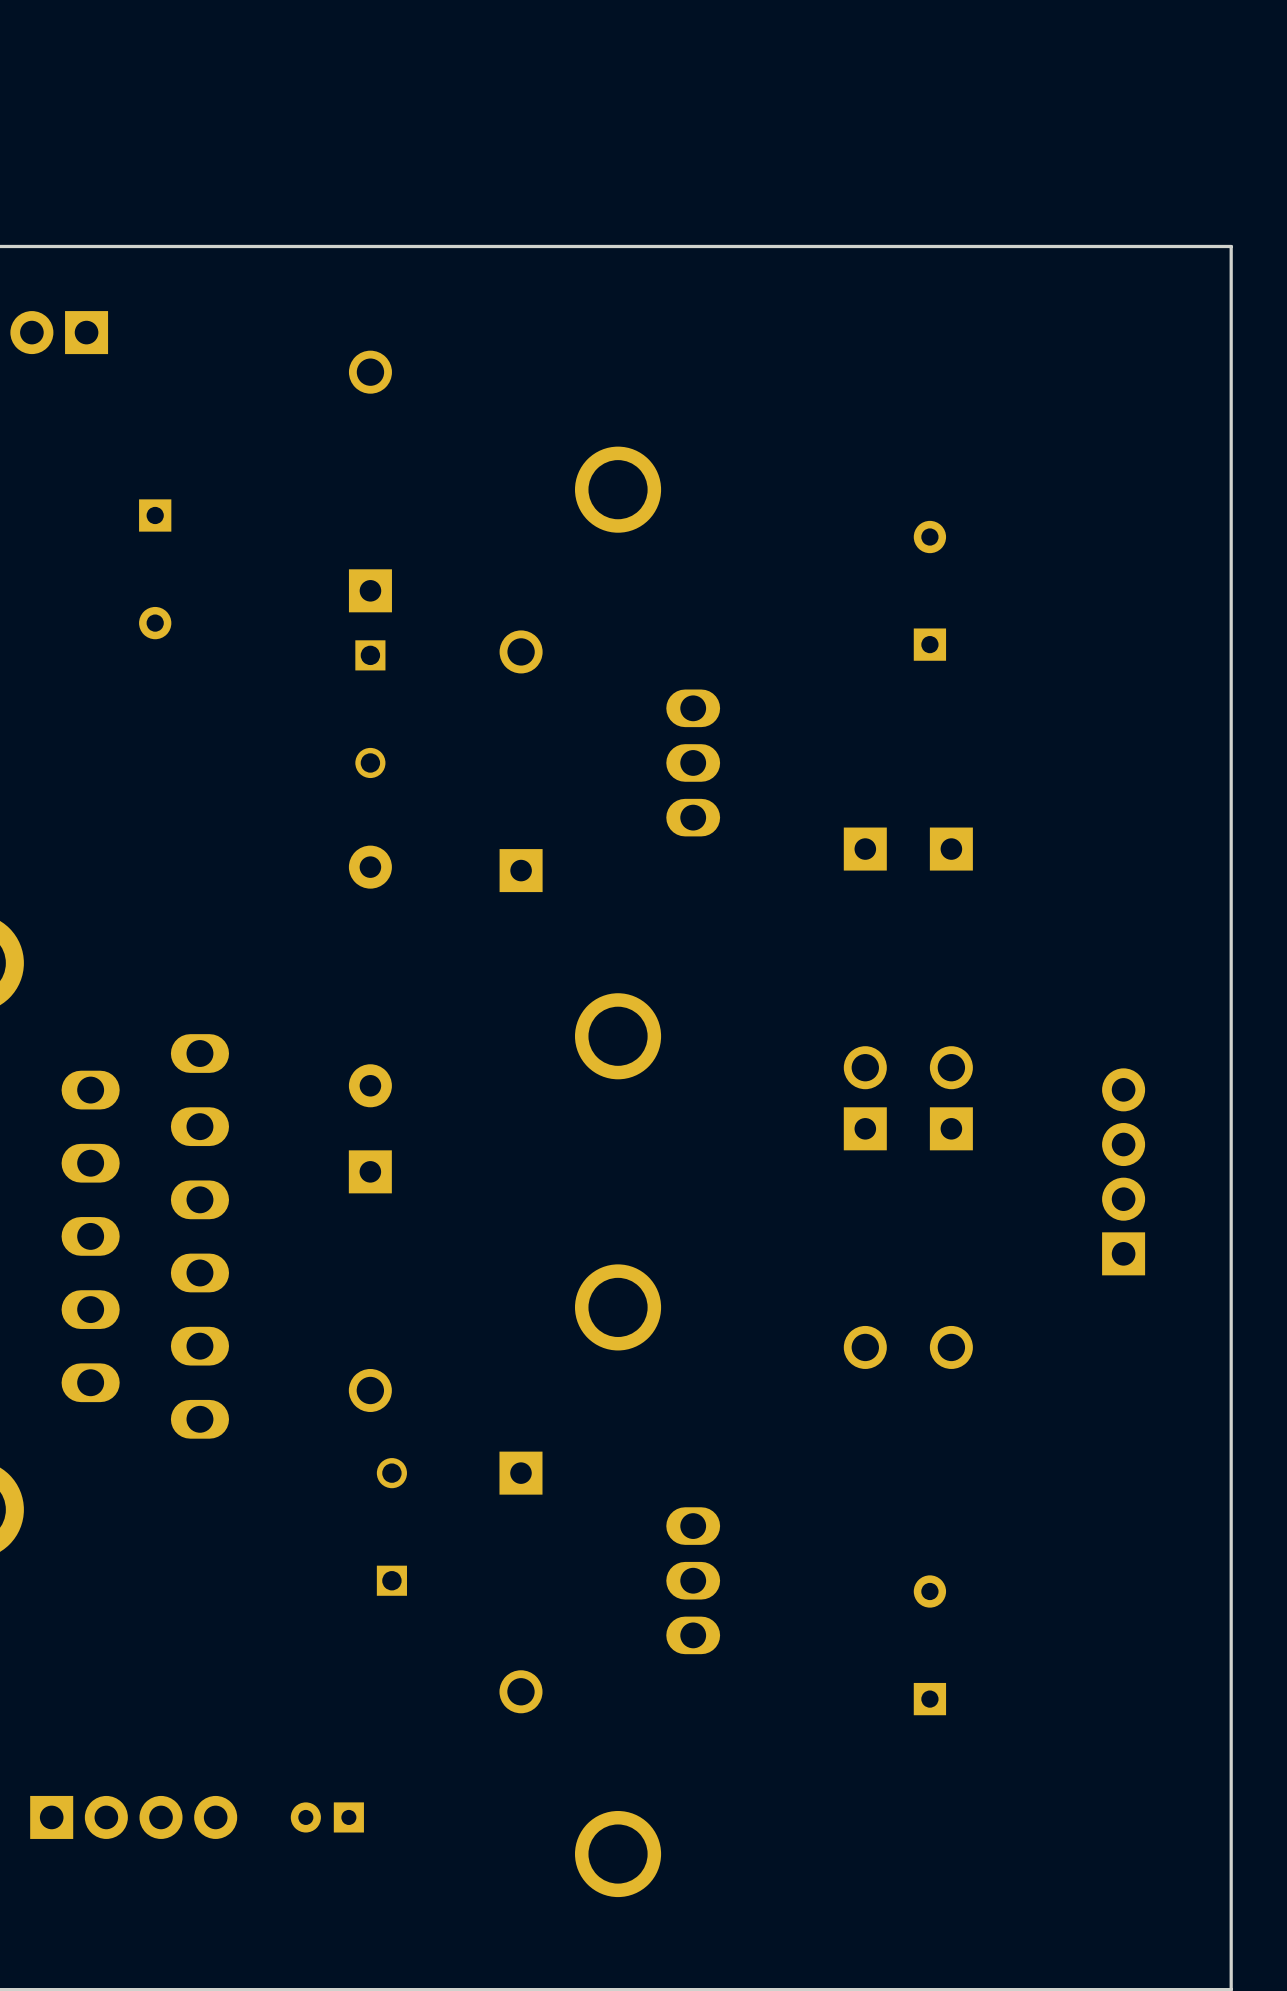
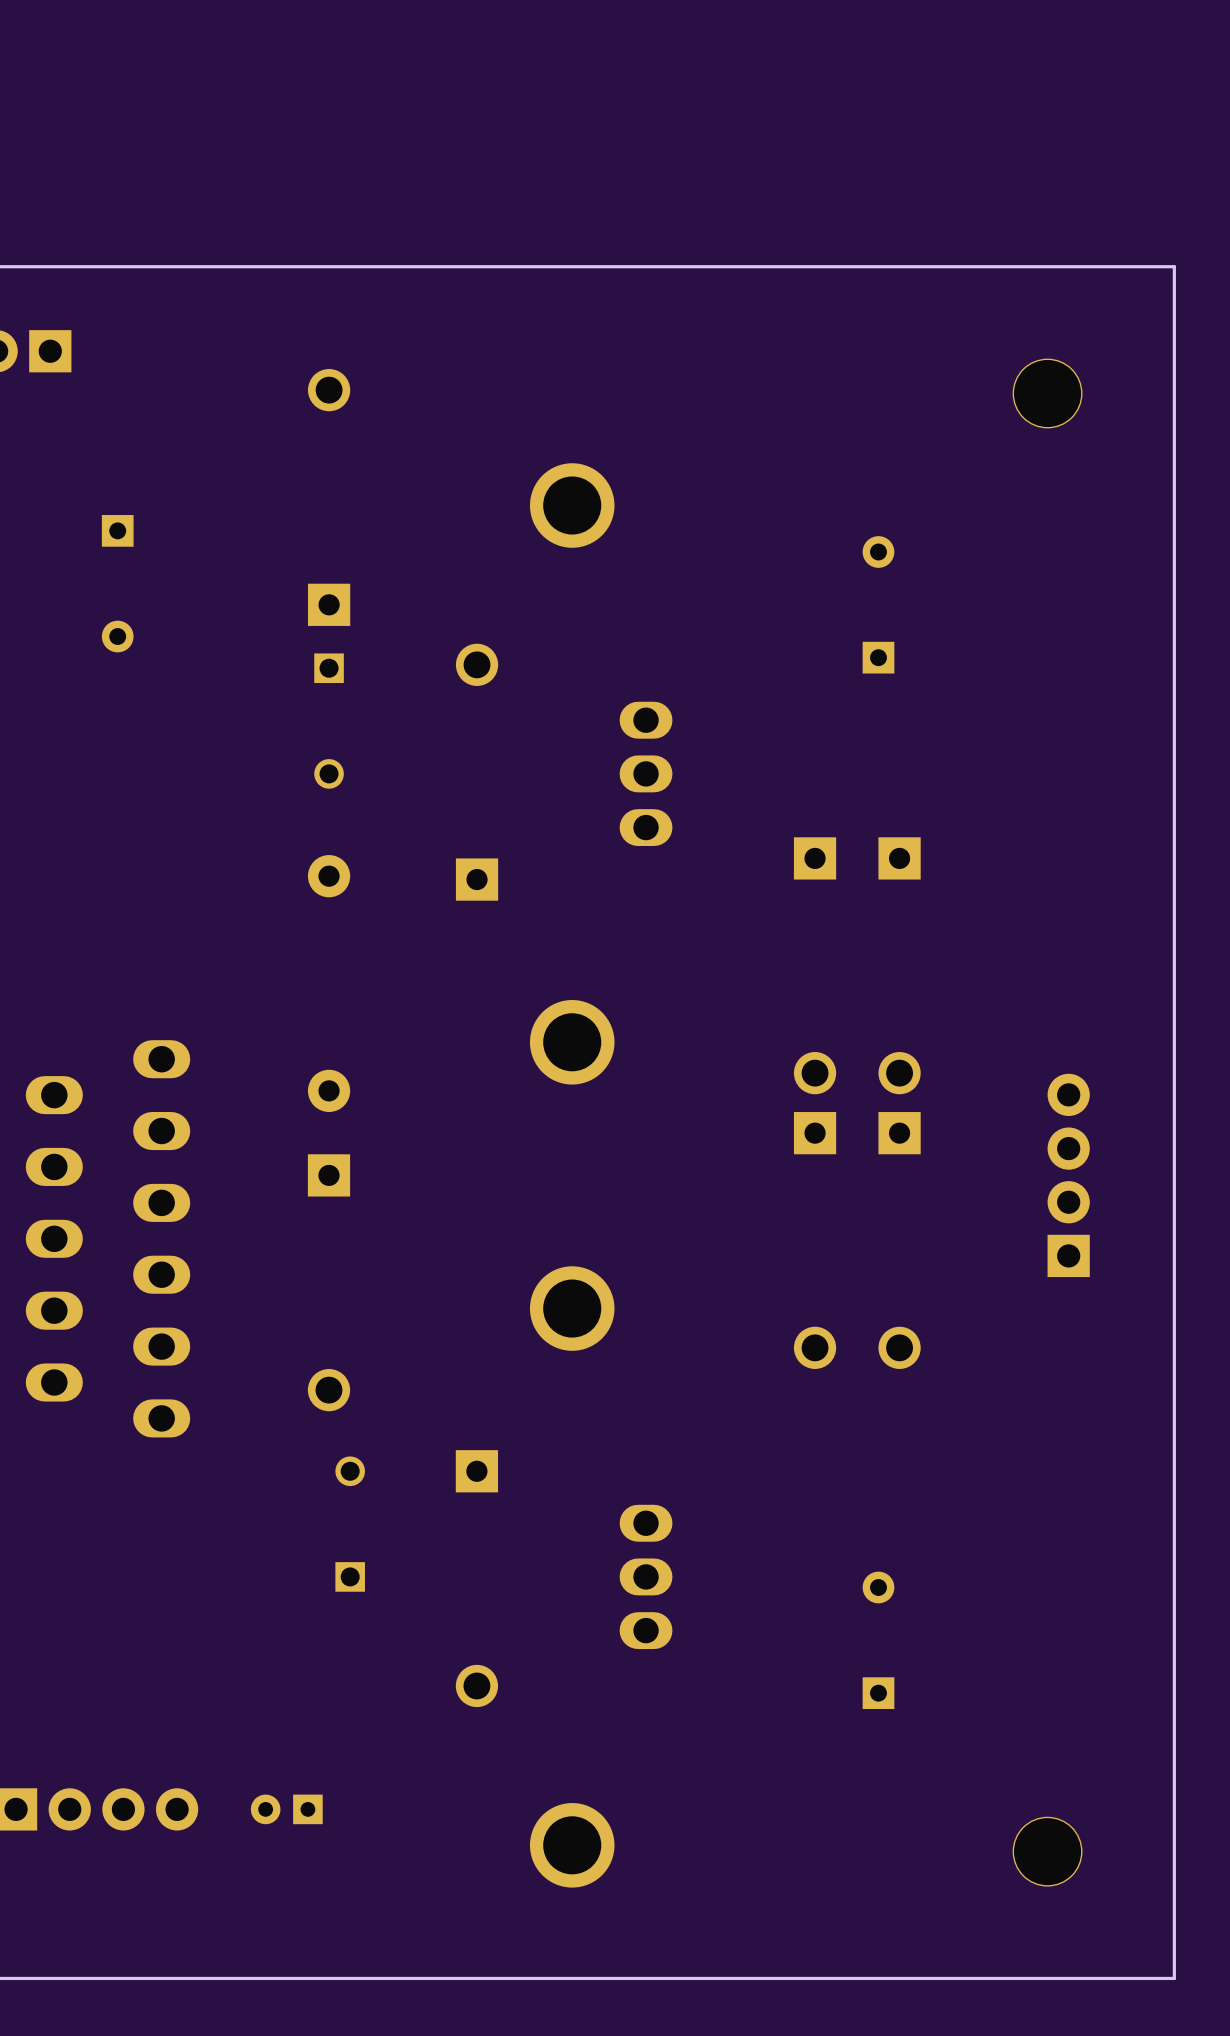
part: none -> (1047, 393)
part: none -> (1047, 1851)

